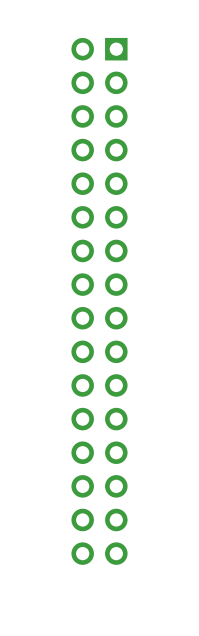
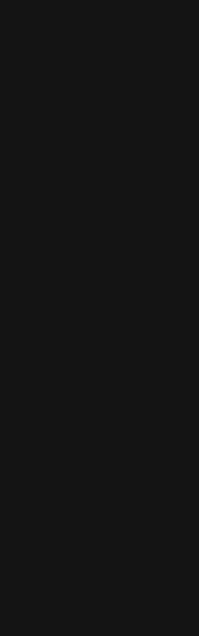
part: (99, 301) -> none

